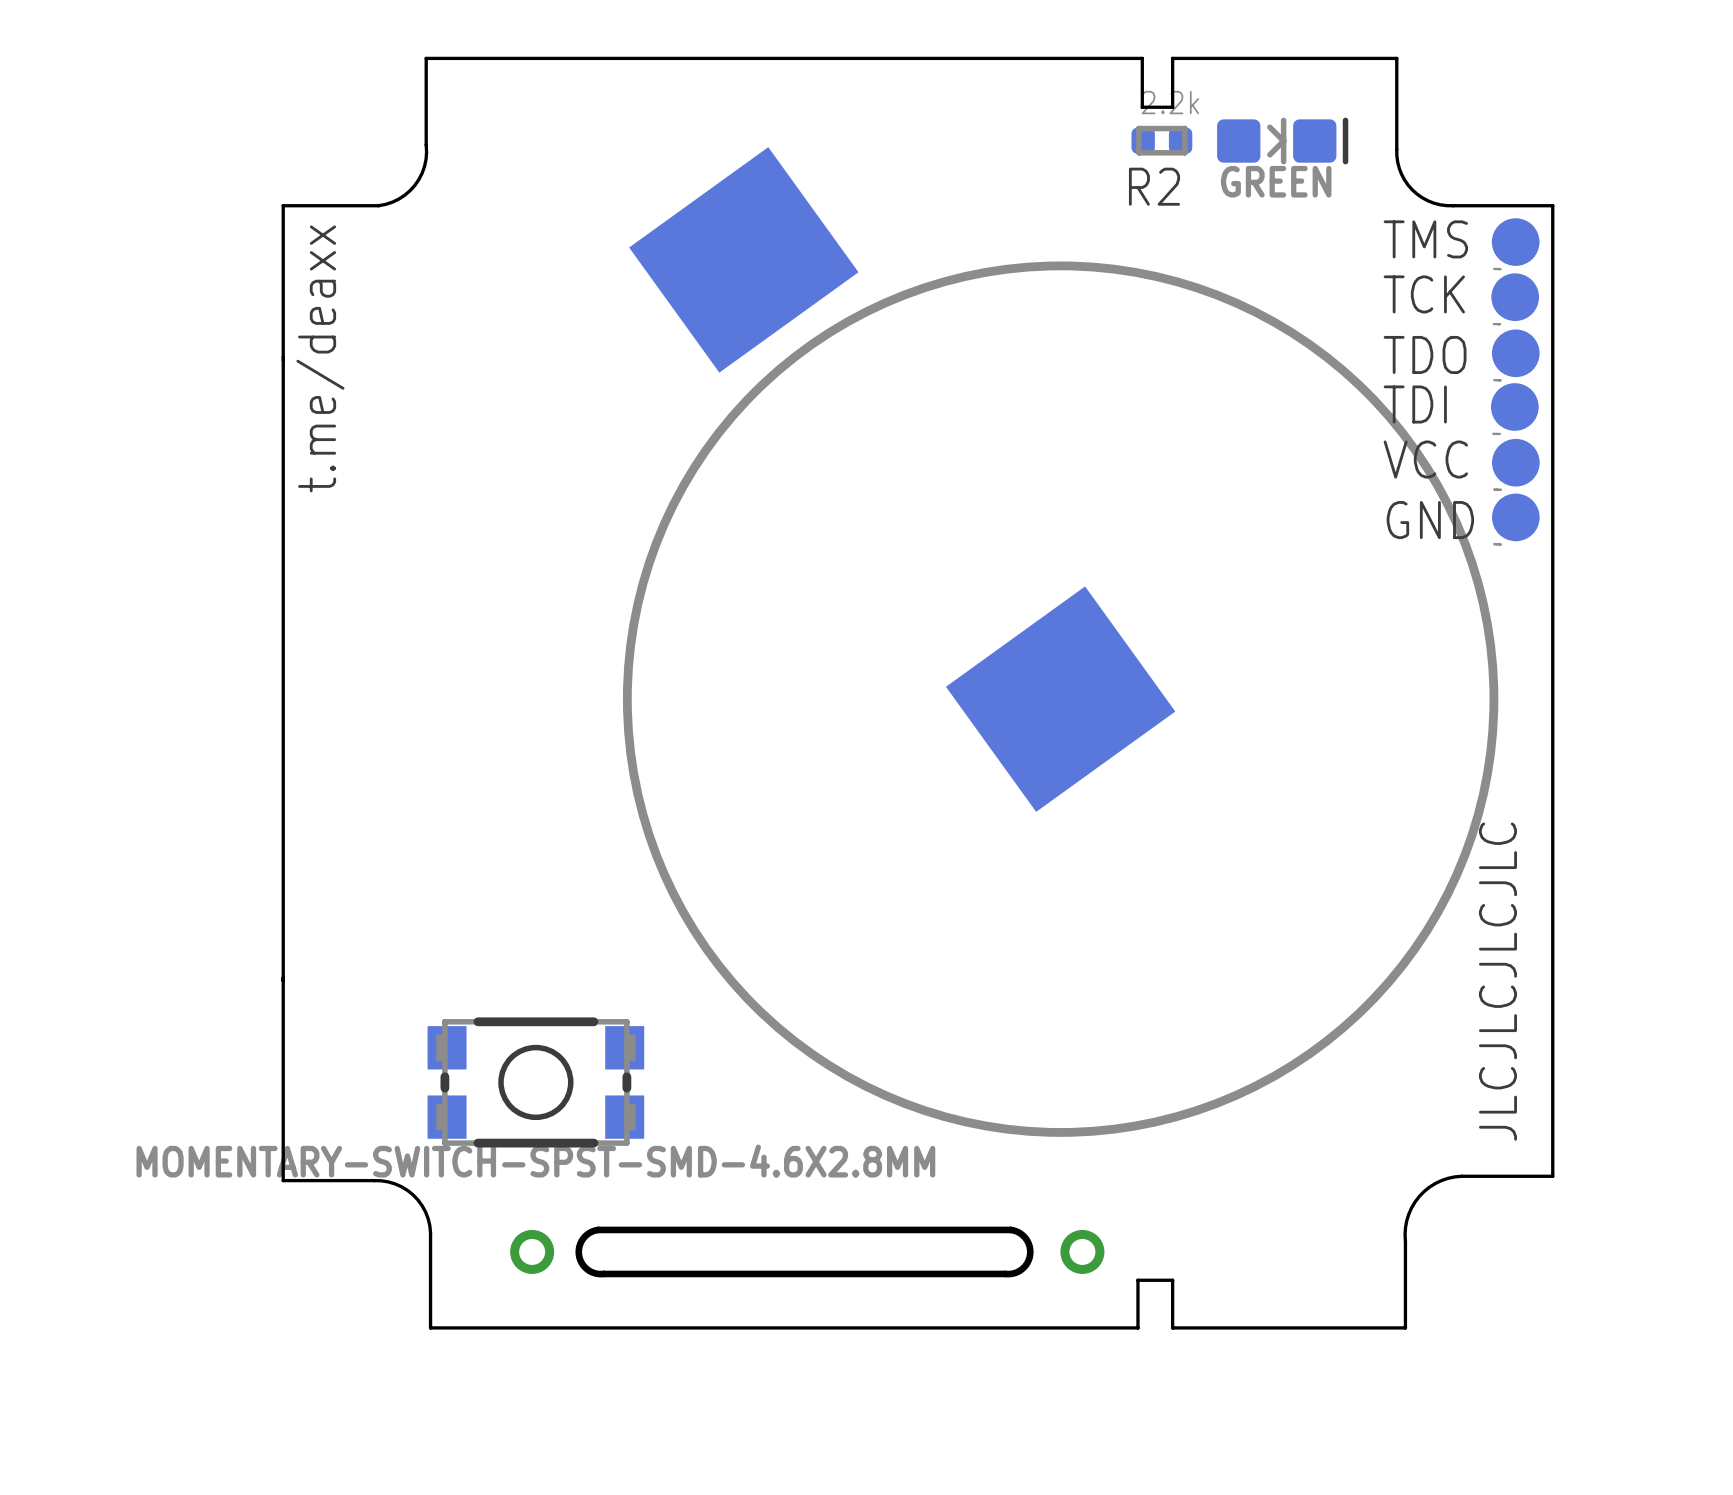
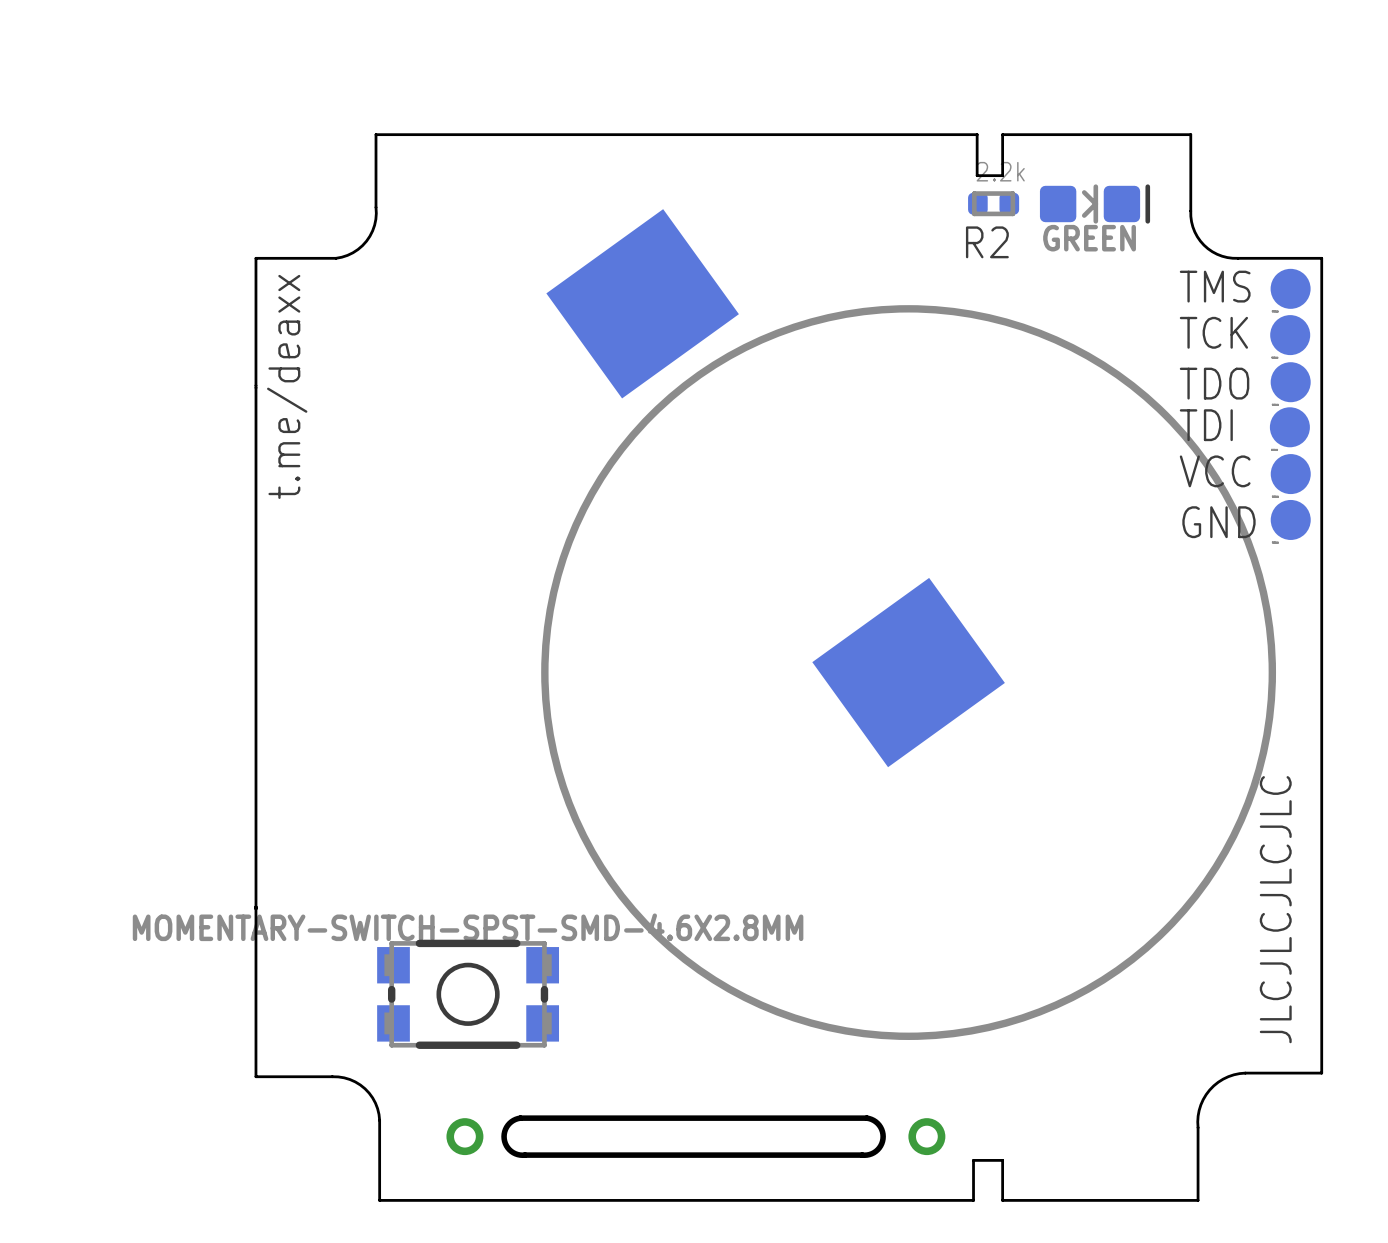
part value position: MOMENTARY-SWITCH-SPST-SMD-4.6X2.8MM (535, 1161) -> MOMENTARY-SWITCH-SPST-SMD-4.6X2.8MM (468, 927)

